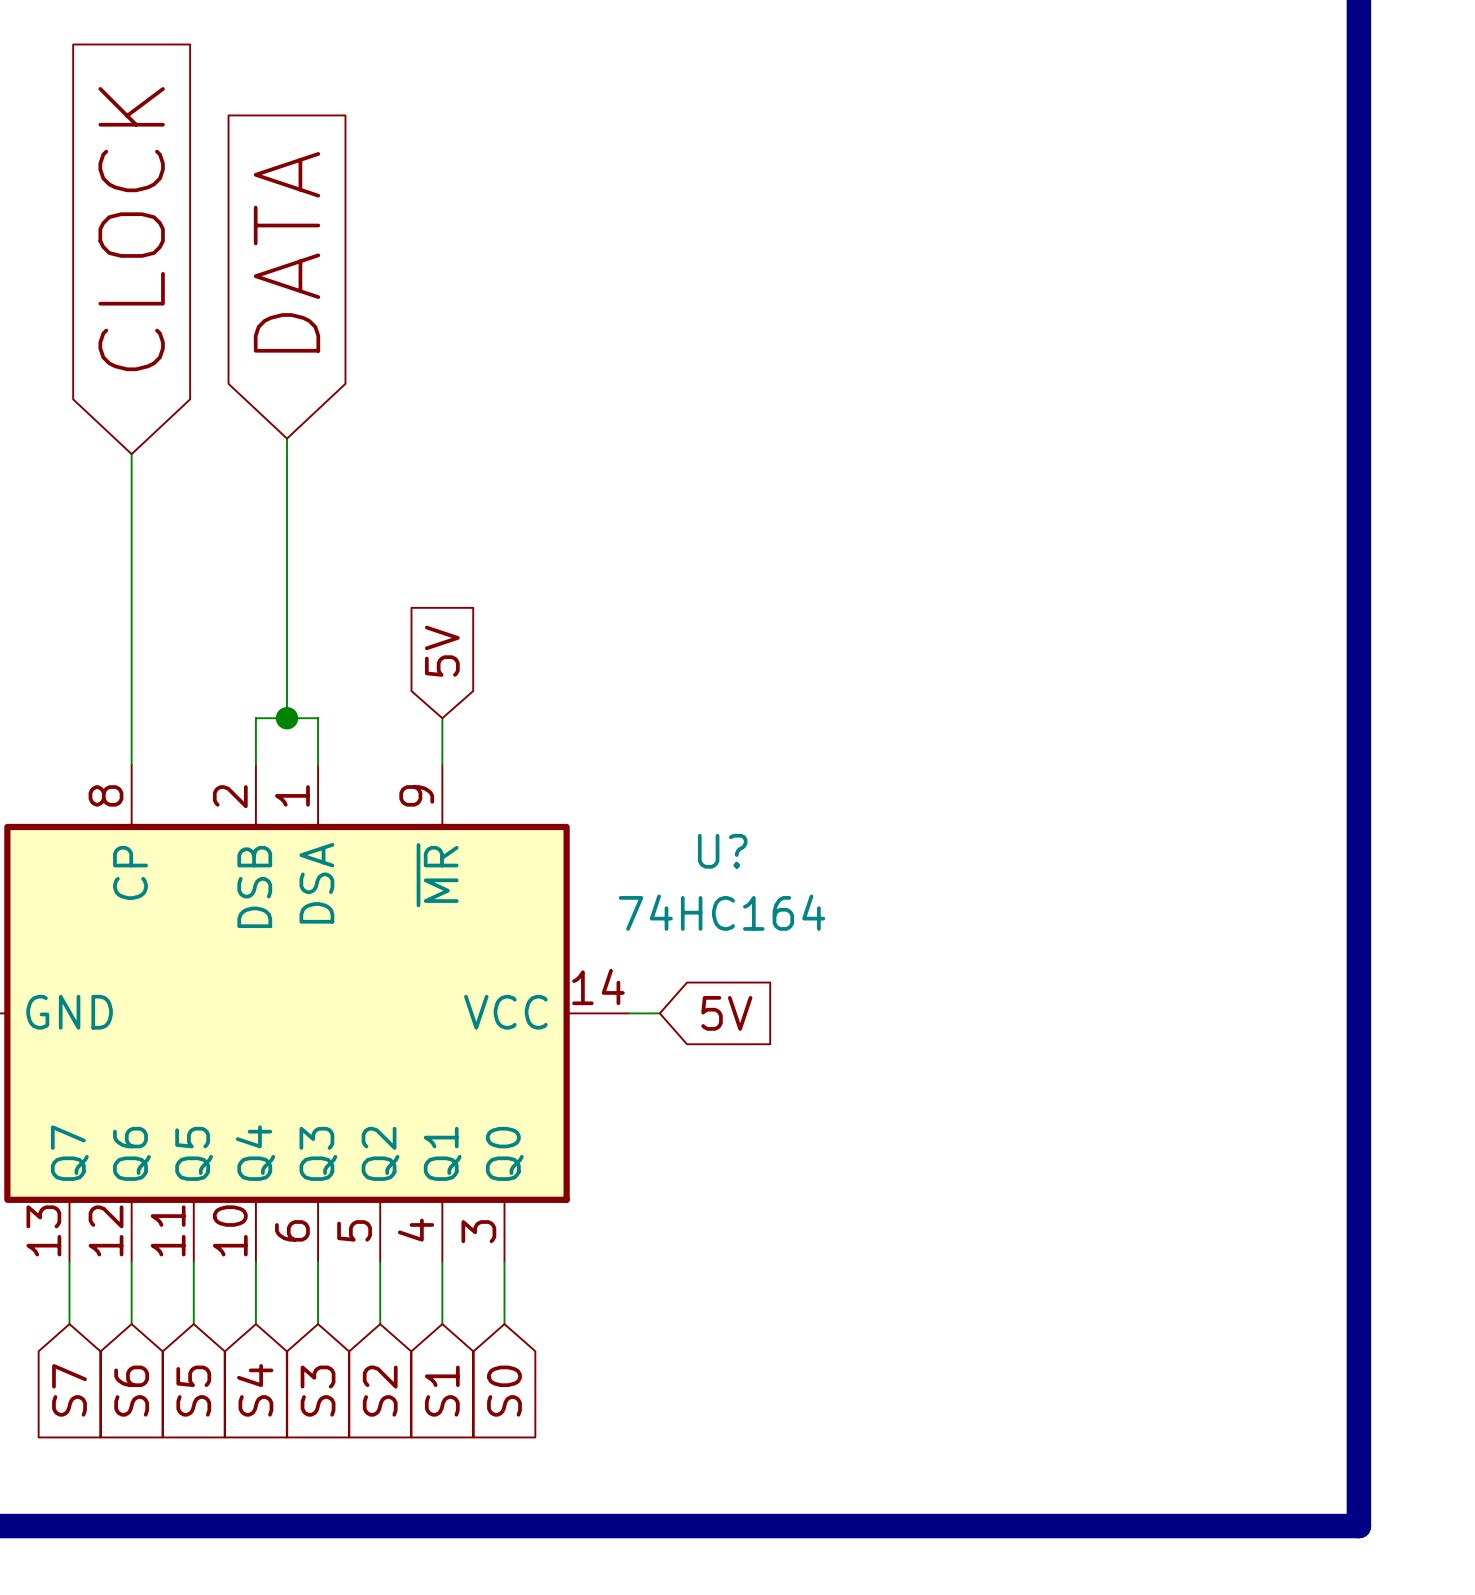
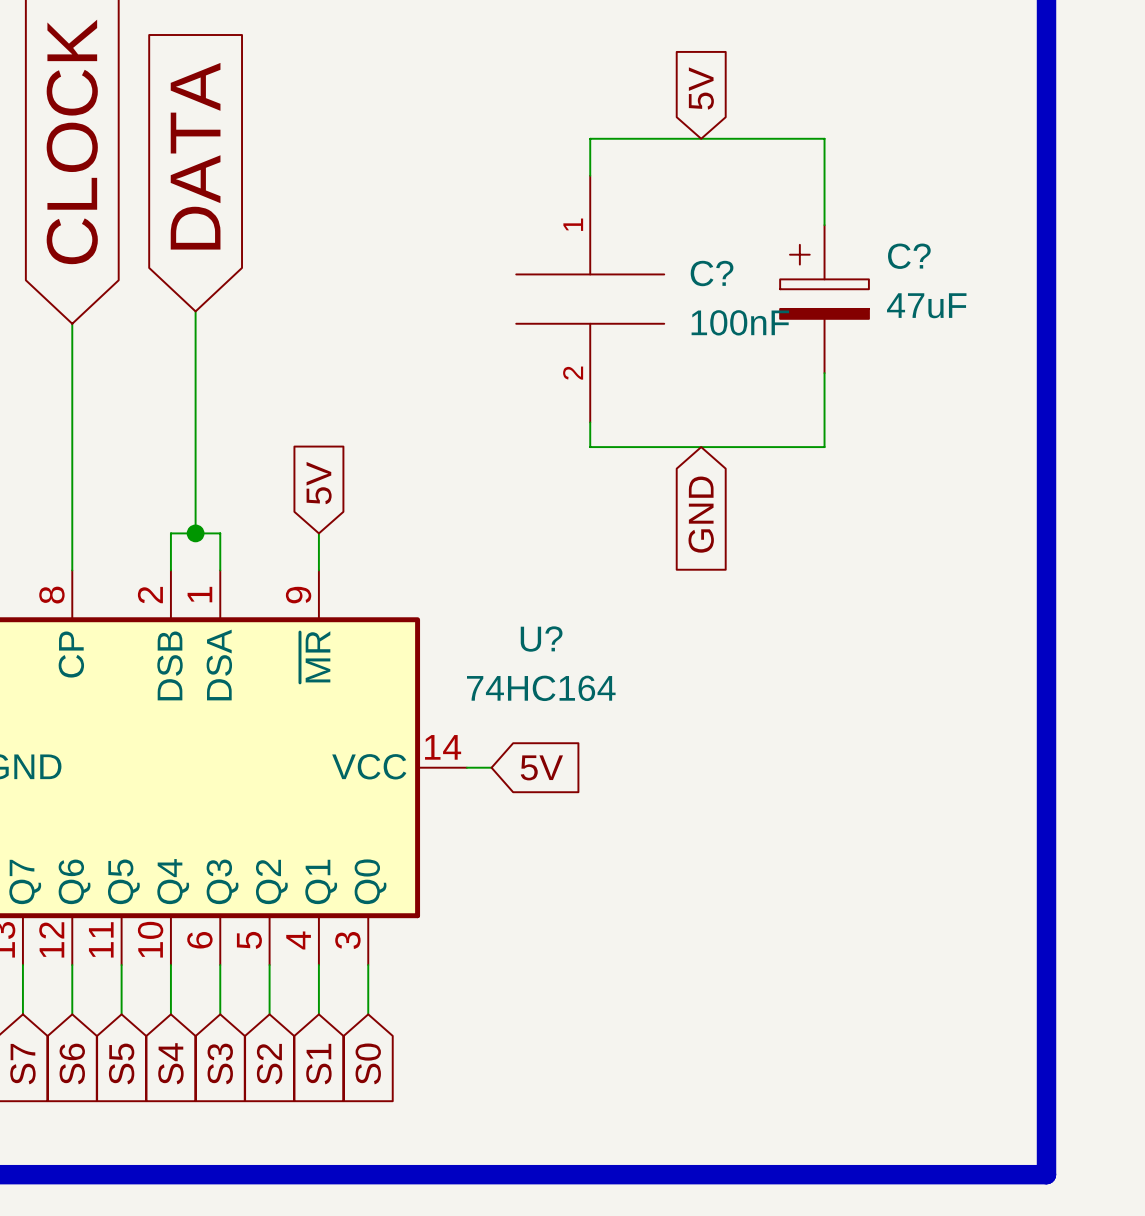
global label: none -> 5V (701, 88)
wire: none -> (590, 175) (590, 138) (824, 138) (824, 225)
C?: none -> 100nF (590, 299)
C?: none -> 47uF (824, 299)
wire: none -> (824, 373) (824, 447) (590, 447) (590, 422)
global label: none -> GND (701, 514)

